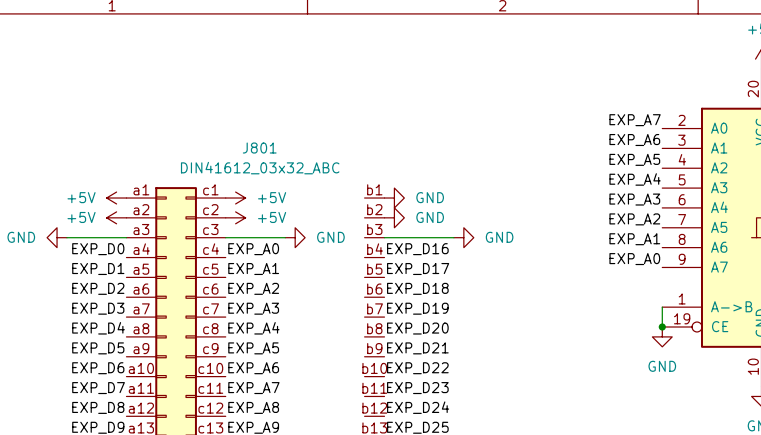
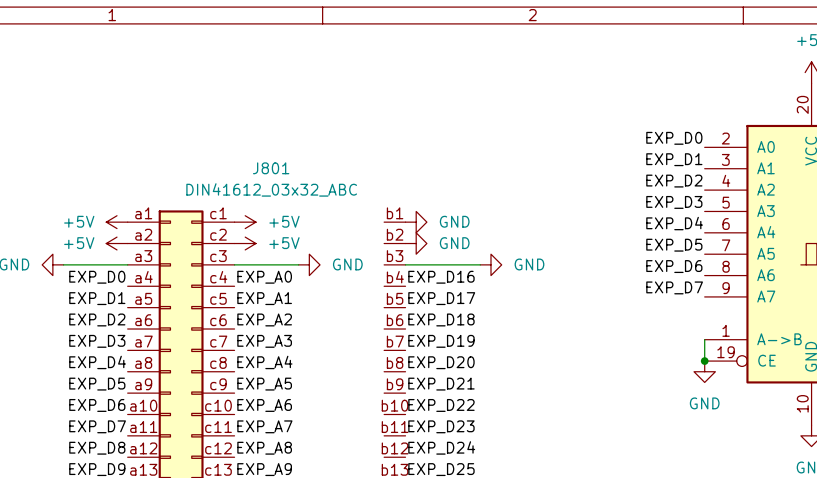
label: EXP_A7 (635, 120) -> EXP_D0 (674, 138)
label: EXP_A6 (634, 140) -> EXP_D1 (674, 159)
label: EXP_A5 (634, 159) -> EXP_D2 (674, 181)
label: EXP_A4 (635, 179) -> EXP_D3 (674, 202)
label: EXP_A3 (634, 199) -> EXP_D4 (674, 223)
label: EXP_A2 (634, 219) -> EXP_D5 (674, 245)
label: EXP_A1 (634, 239) -> EXP_D6 (674, 266)
label: EXP_A0 (634, 259) -> EXP_D7 (674, 287)

